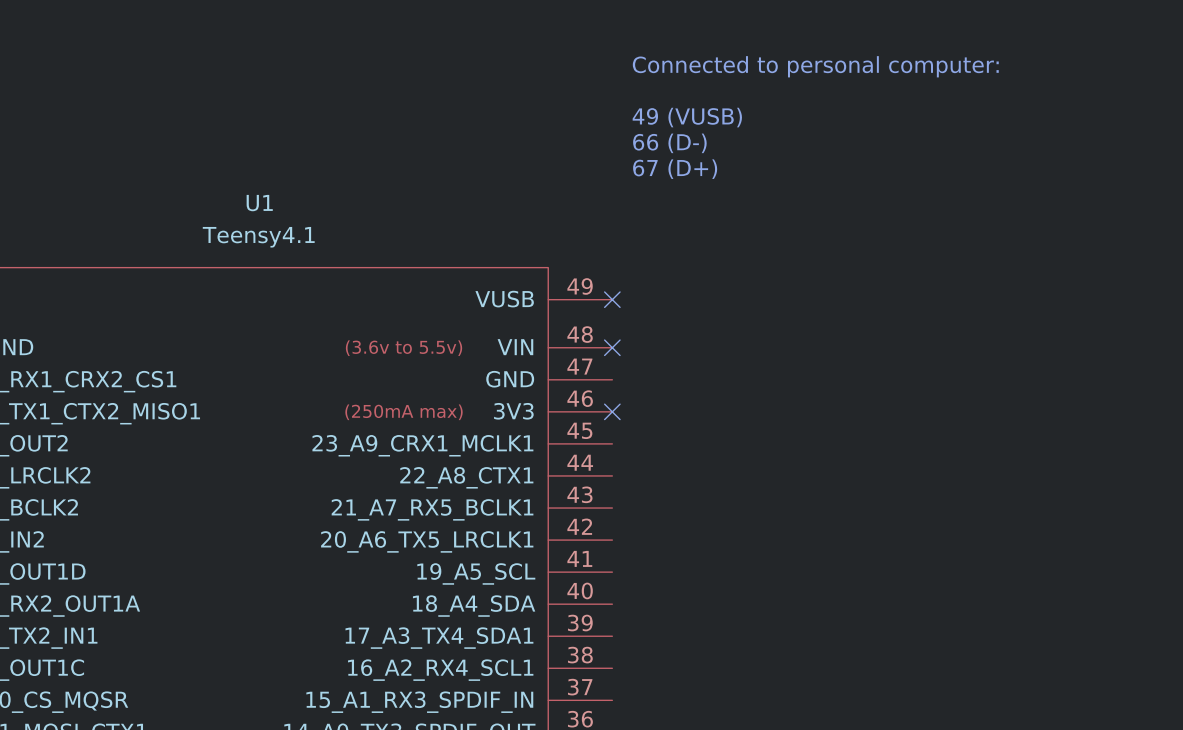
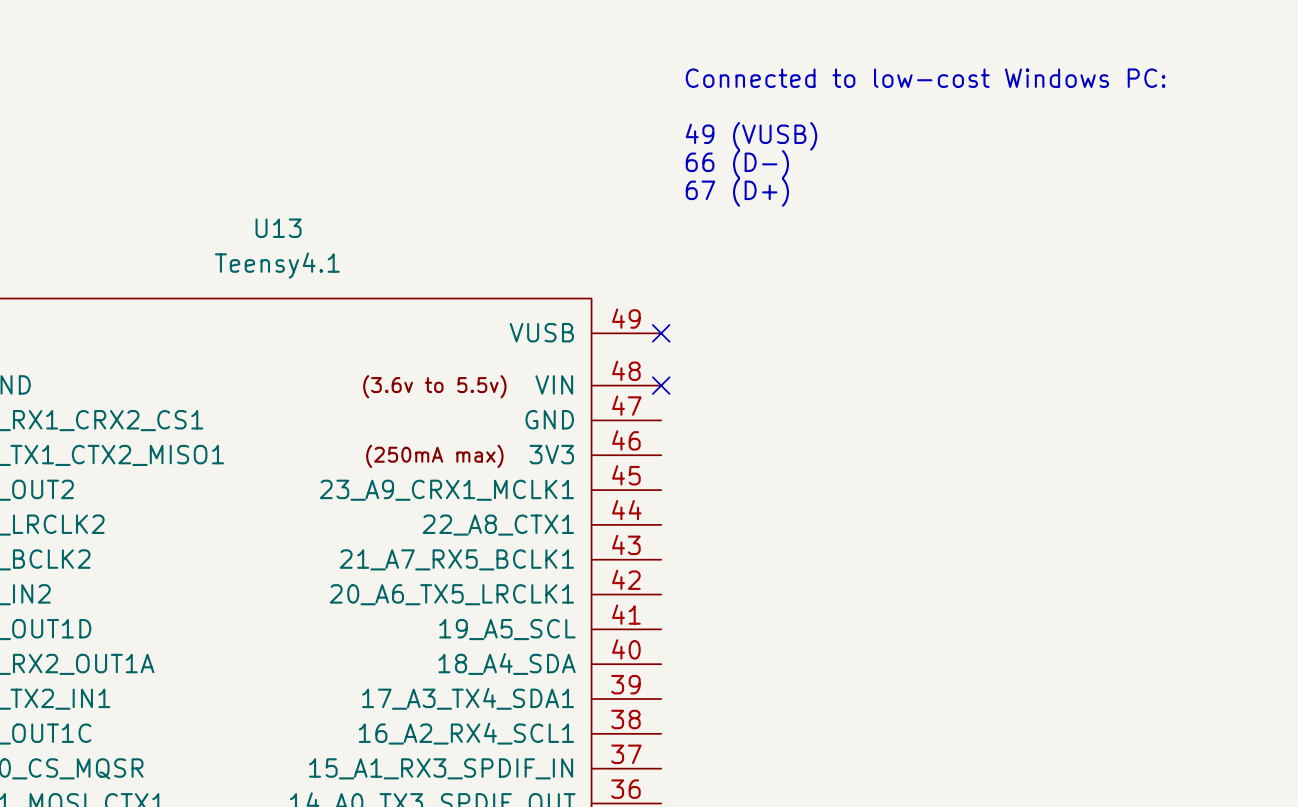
text: Connected to personal computer: (815, 66) -> Connected to low-cost Windows PC: (925, 78)
U1 name: U1 (259, 203) -> U13 (278, 228)
no-connect mark: (612, 411) -> none

